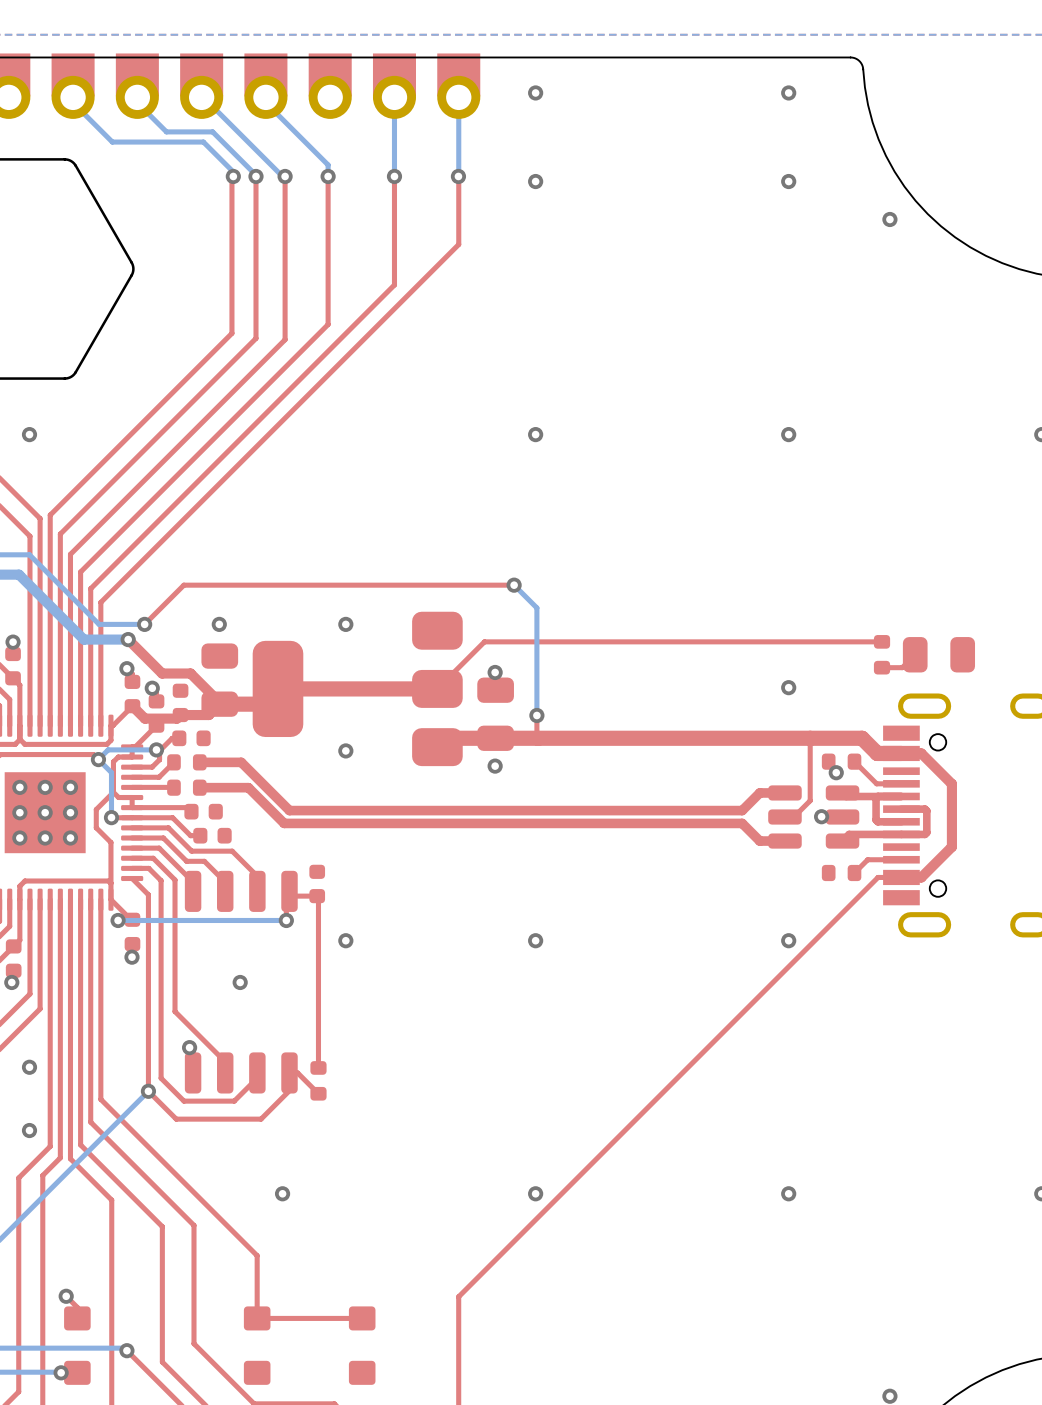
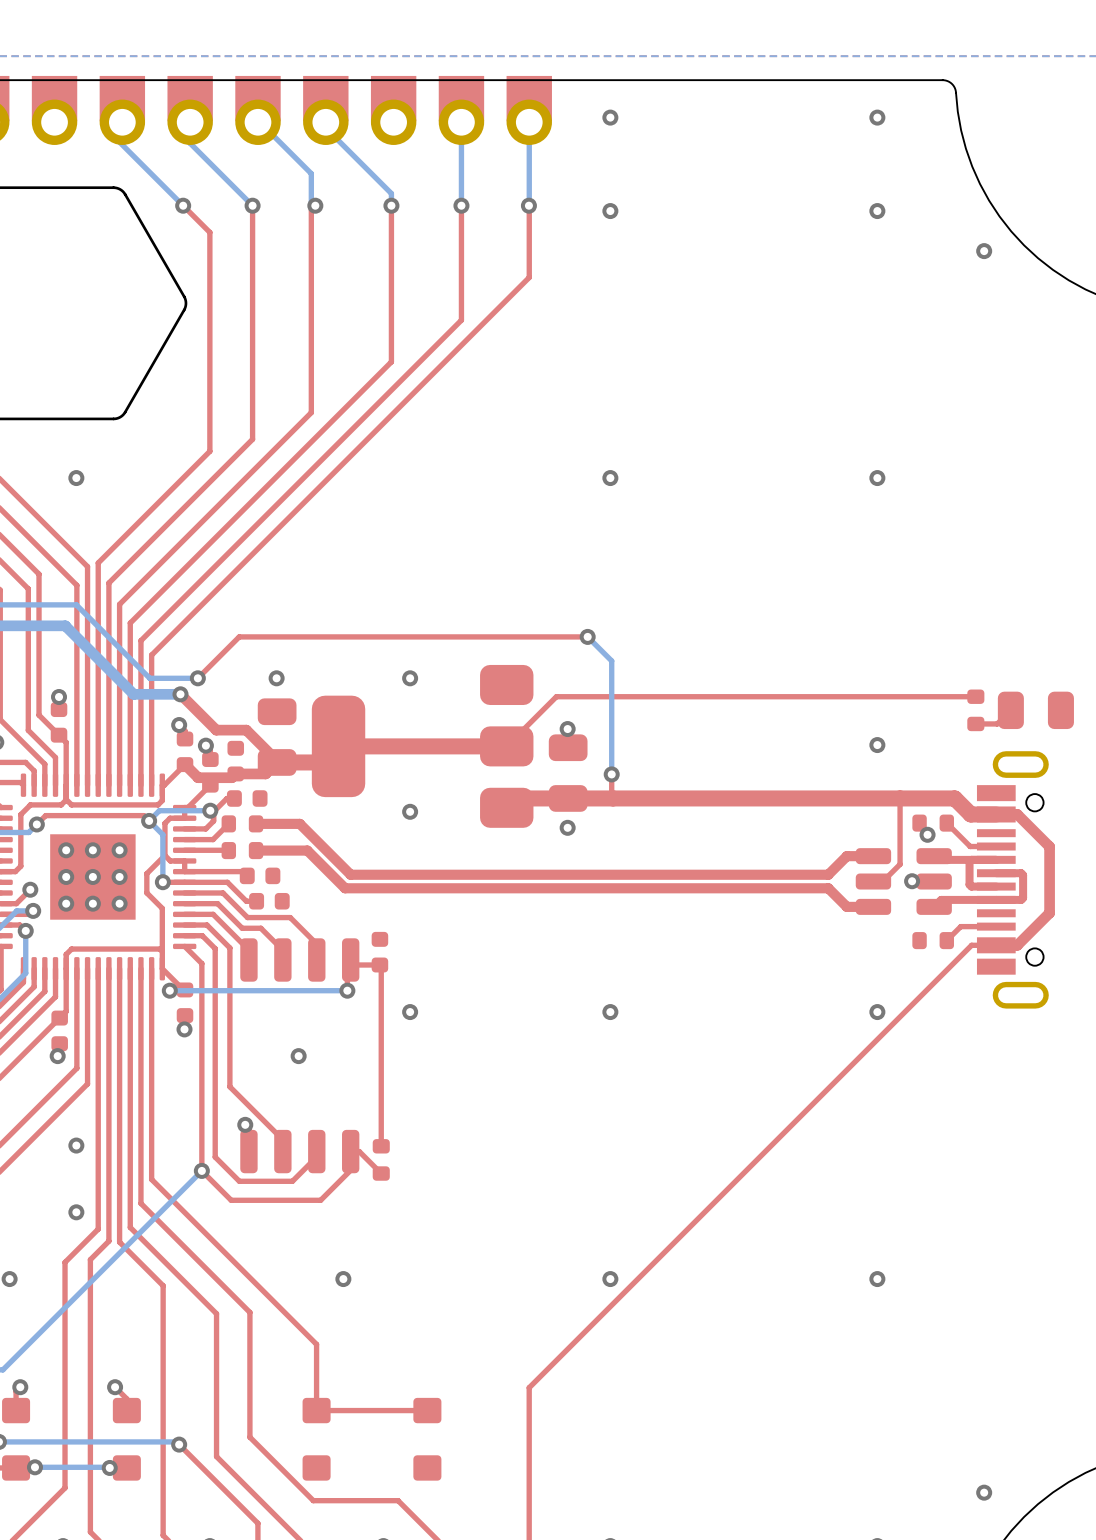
bottom track: none -> (190, 122) (190, 143) (252, 205)
bottom track: (73, 102) (112, 142) (203, 142) (233, 171) (233, 176) -> (122, 127) (119, 131) (119, 141) (183, 205)
bottom track: (137, 102) (166, 131) (212, 131) (255, 176) -> none
bottom track: (252, 146) (282, 176) (285, 176) -> (311, 173) (311, 205)
top track: (255, 175) (255, 338) (196, 397) -> (252, 205) (252, 439)
via: none -> (183, 205)
top track: (233, 176) (231, 333) (156, 409) -> (183, 205) (209, 232) (209, 451)
via position: (233, 176) -> (252, 205)
top track: (285, 176) (285, 339) (252, 372) -> (311, 205) (311, 412)
via: (285, 176) -> none

